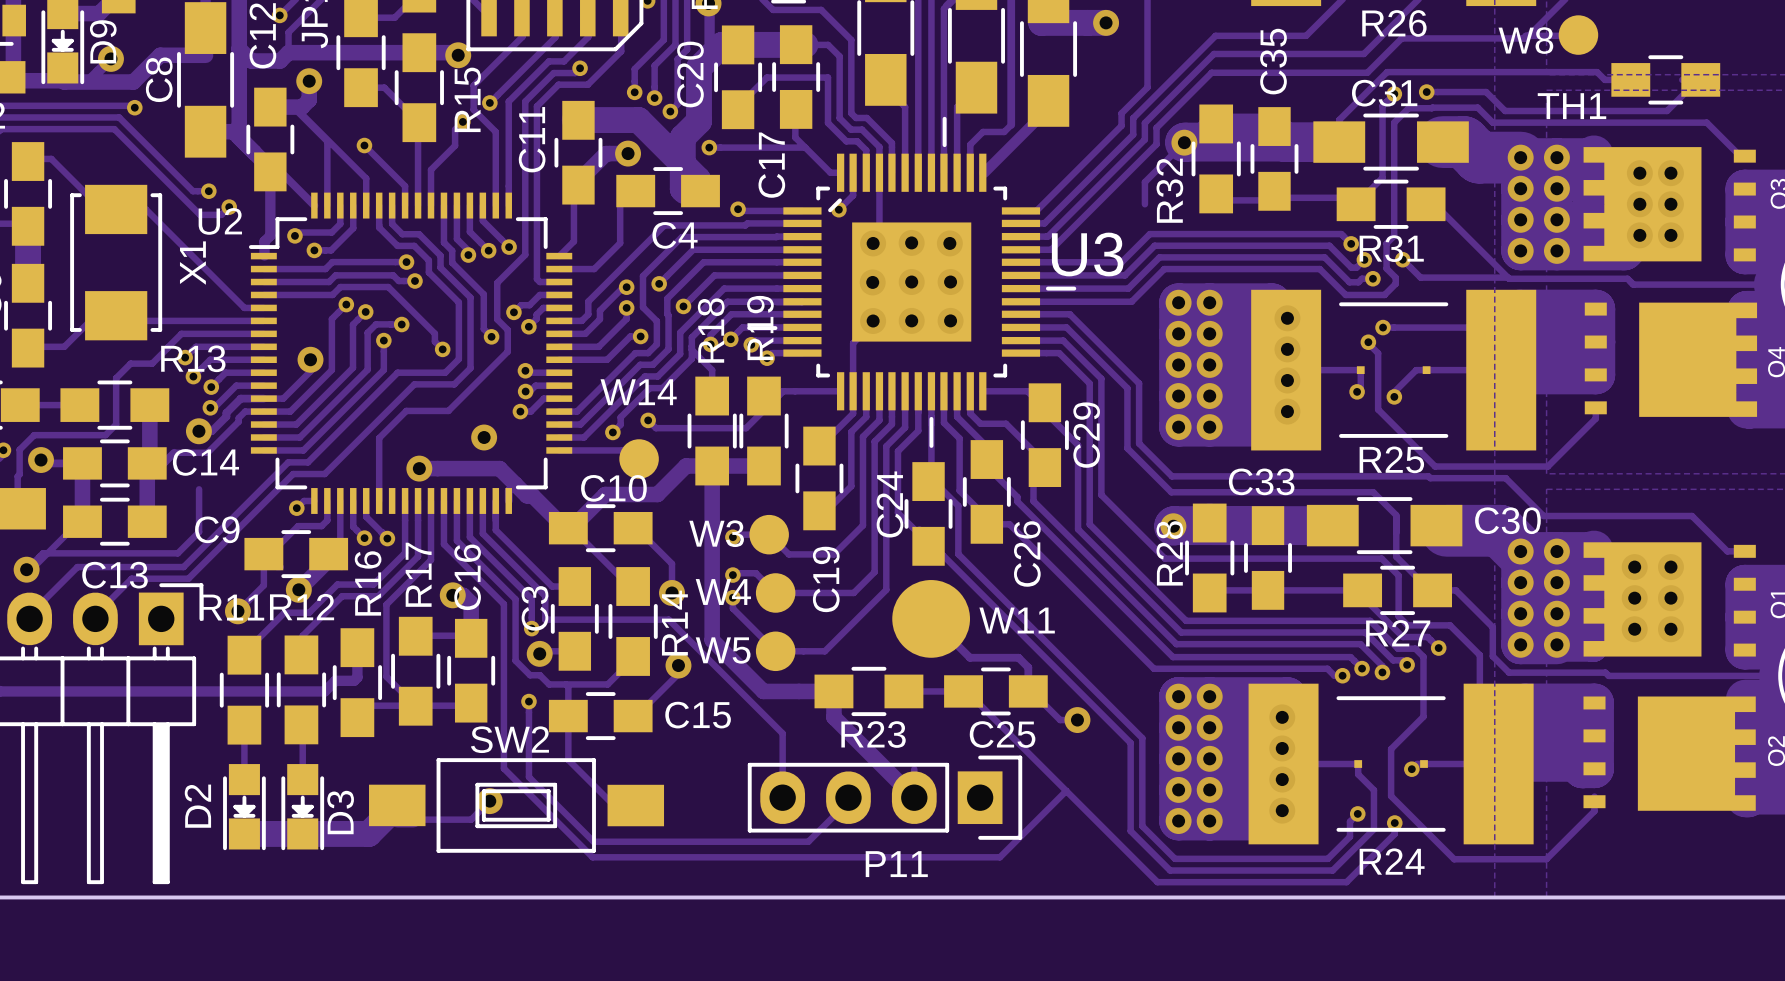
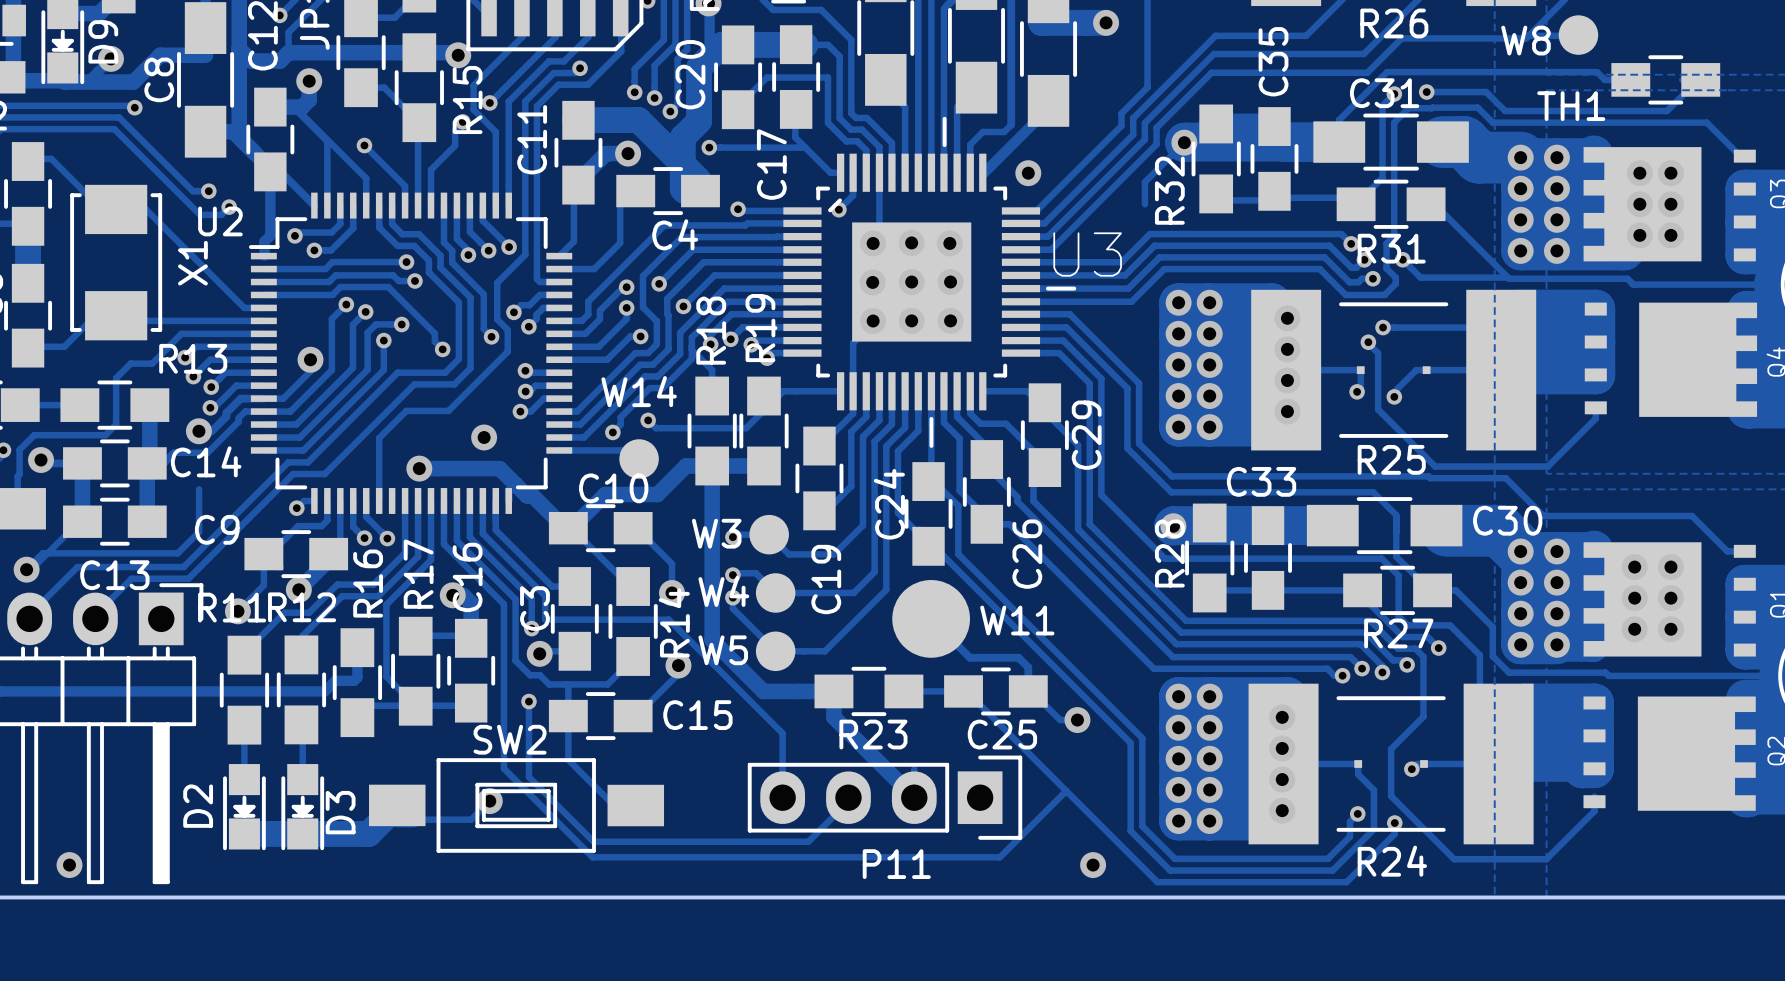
via: none -> (1028, 173)
via: none -> (69, 865)
via: none -> (1093, 865)

